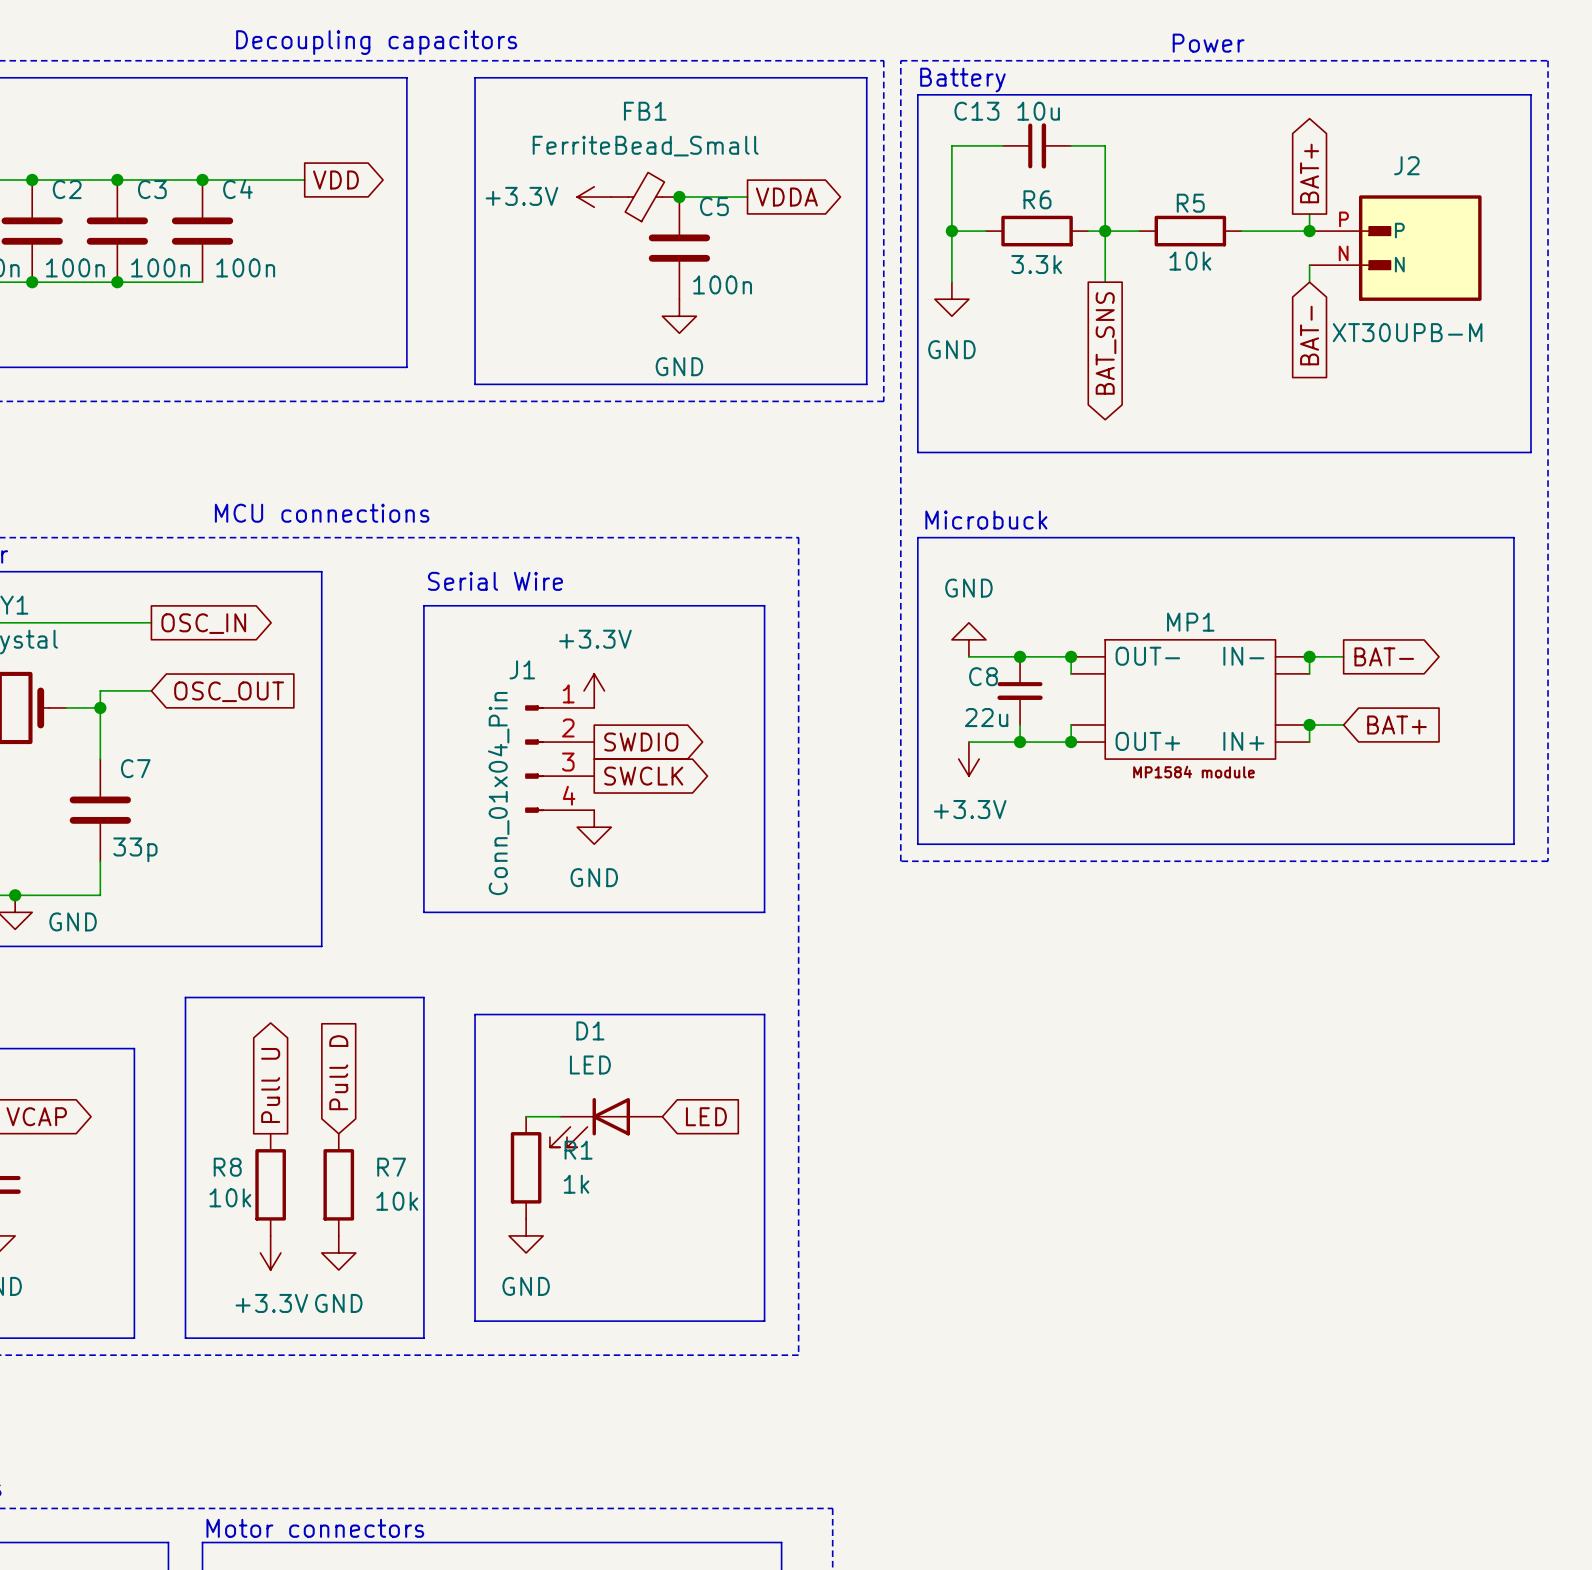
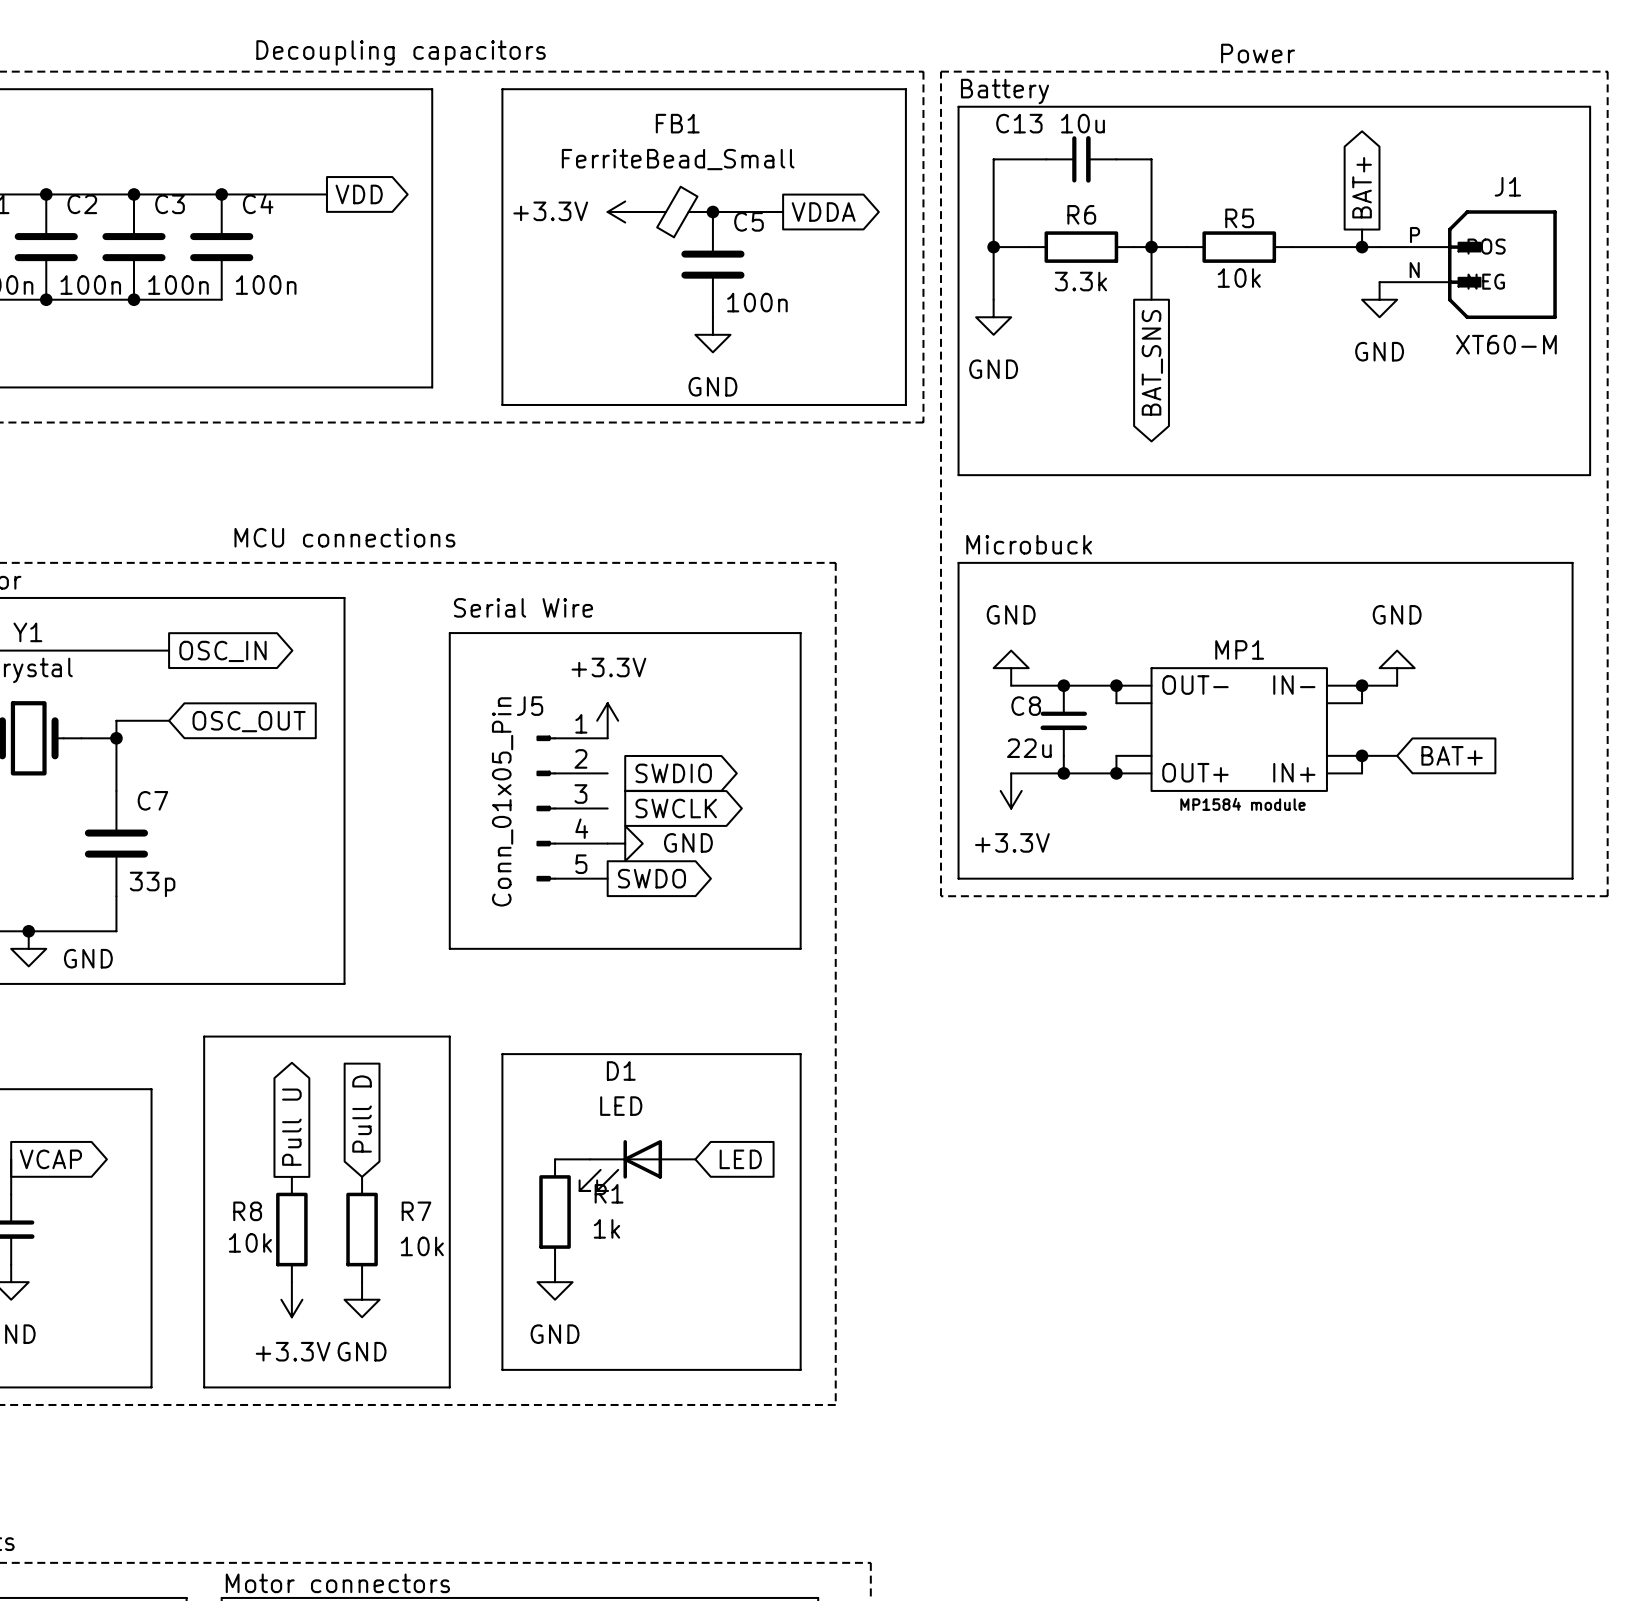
J2: XT30UPB-M (1395, 248) -> none
wire: (1309, 265) (1309, 282) -> none
power symbol: none -> GND (1379, 299)
global label: BAT- (1309, 335) -> none
power symbol: none -> GND (1397, 668)
global label: BAT- (1384, 656) -> none
J1 name position: J1 (522, 669) -> J1 (1507, 186)
power symbol position: +3.3V (594, 690) -> +3.3V (607, 720)
J1 symbol: [525, 705, 595, 813] -> [1379, 210, 1557, 320]
J5: none -> Conn_01x05_Pin (572, 808)
J1 value: Conn_01x04_Pin (498, 793) -> XT60-M (1506, 344)
power symbol rotation: 0° (594, 827) -> 90° counterclockwise (625, 843)
global label: none -> SWDO (651, 878)

